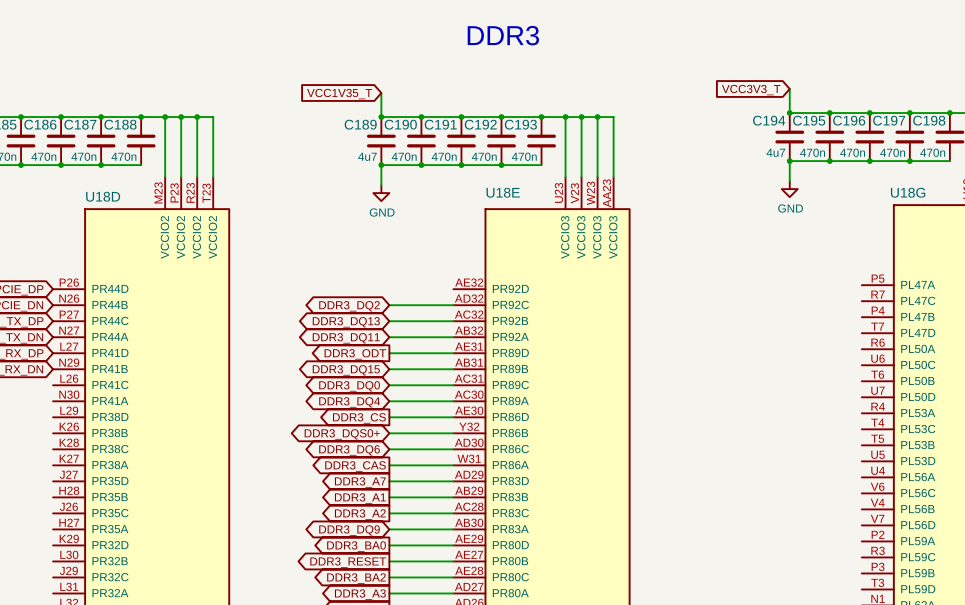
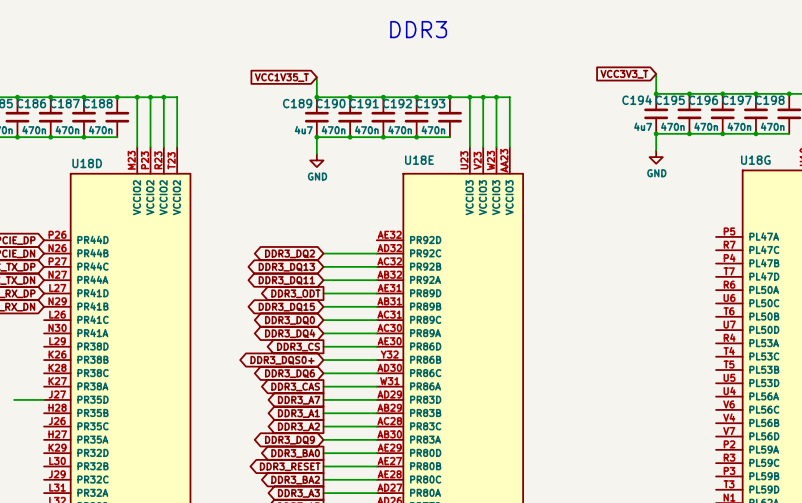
wire: none -> (14, 399) (44, 399)

